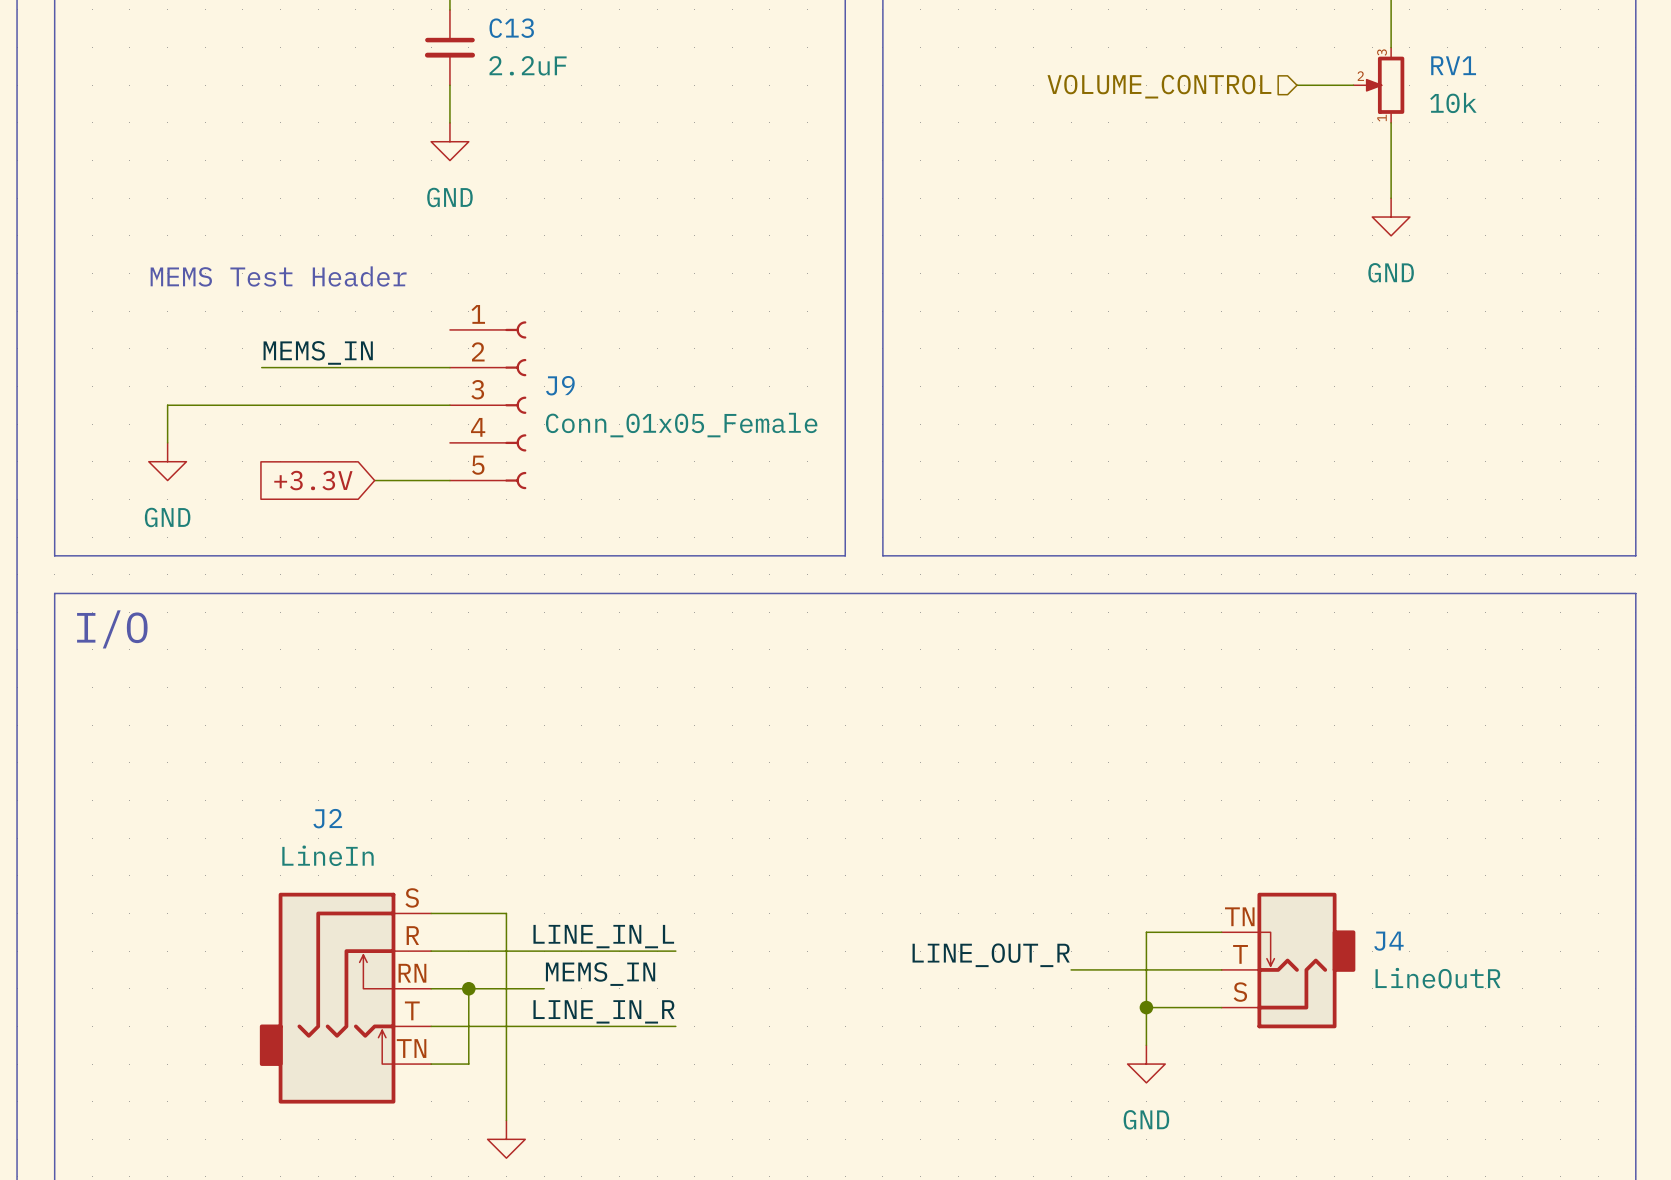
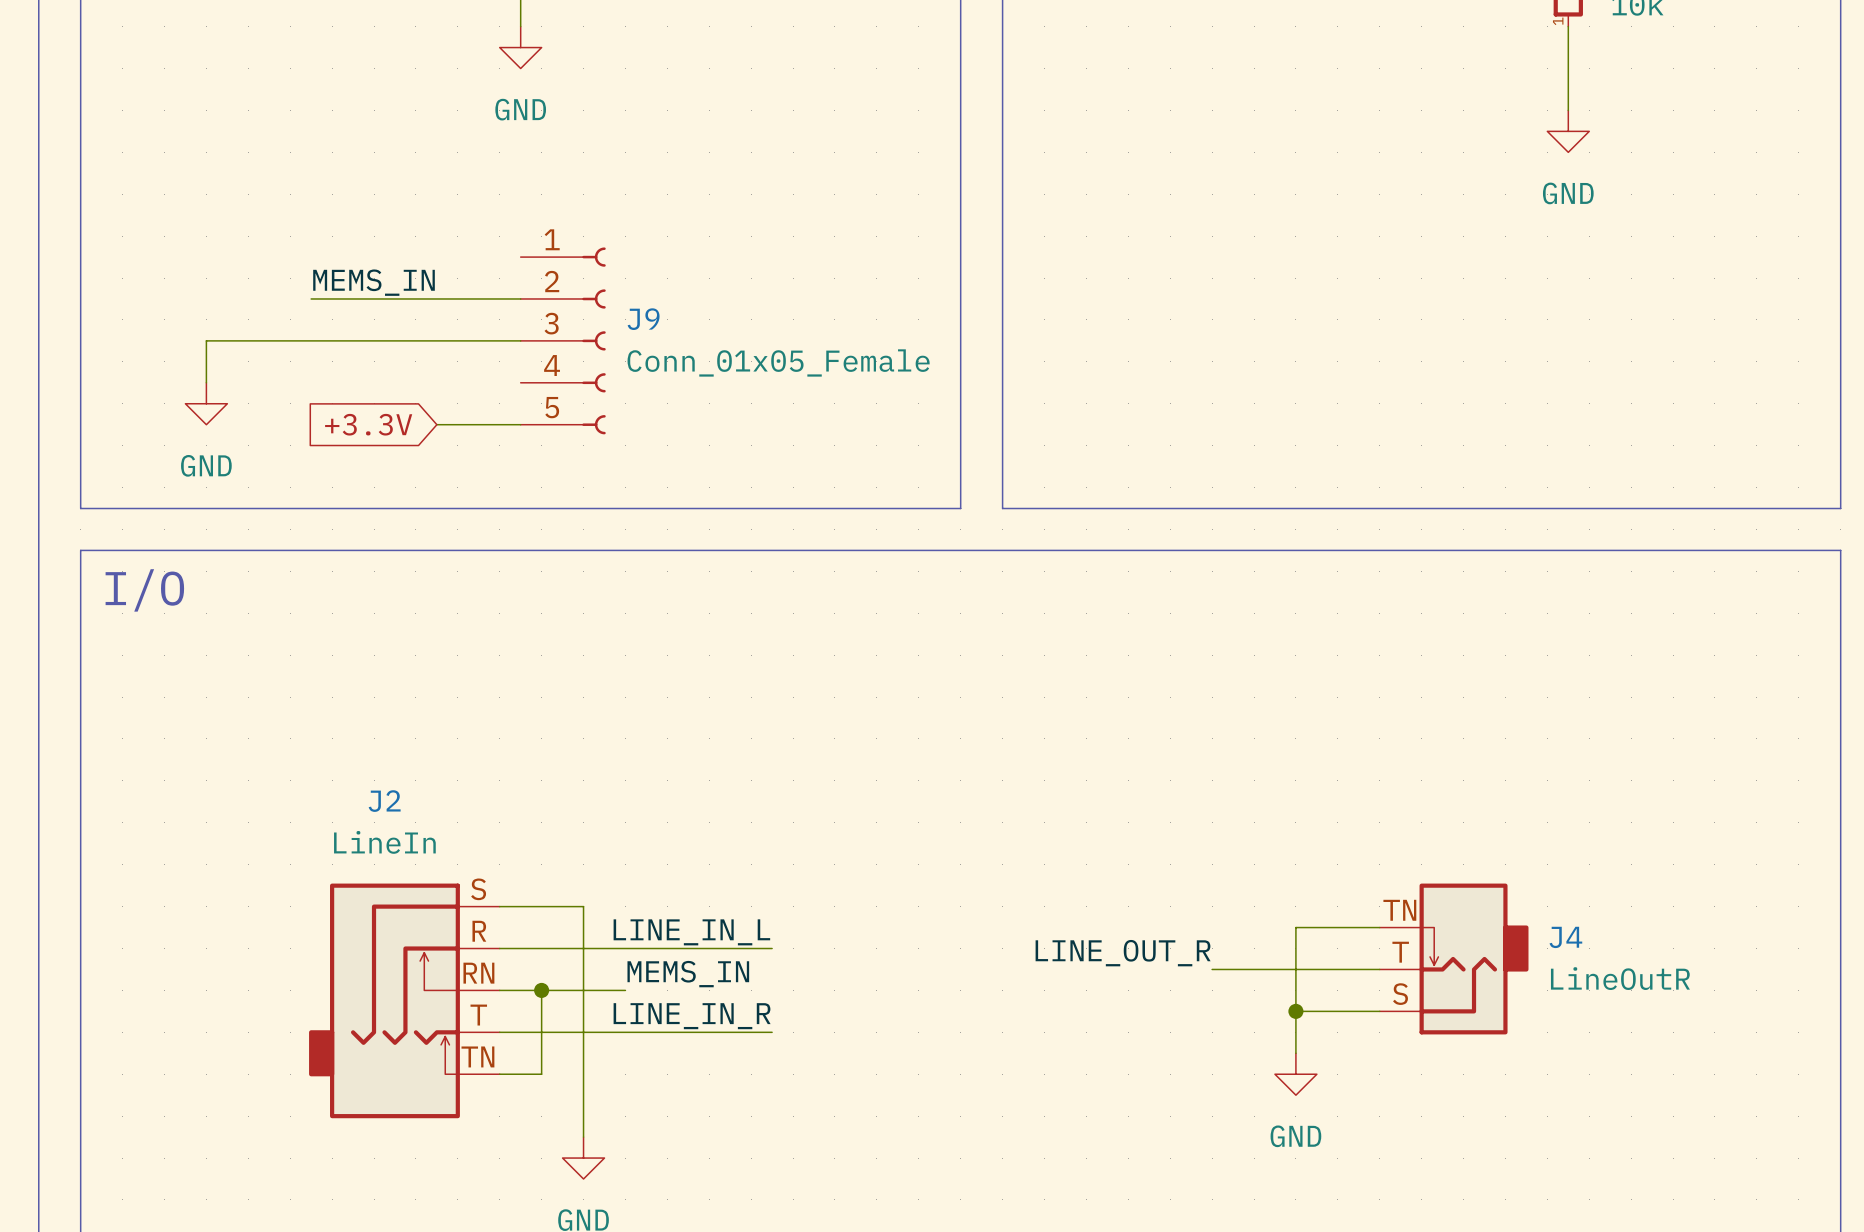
text: MEMS Test Header (278, 276) -> none

